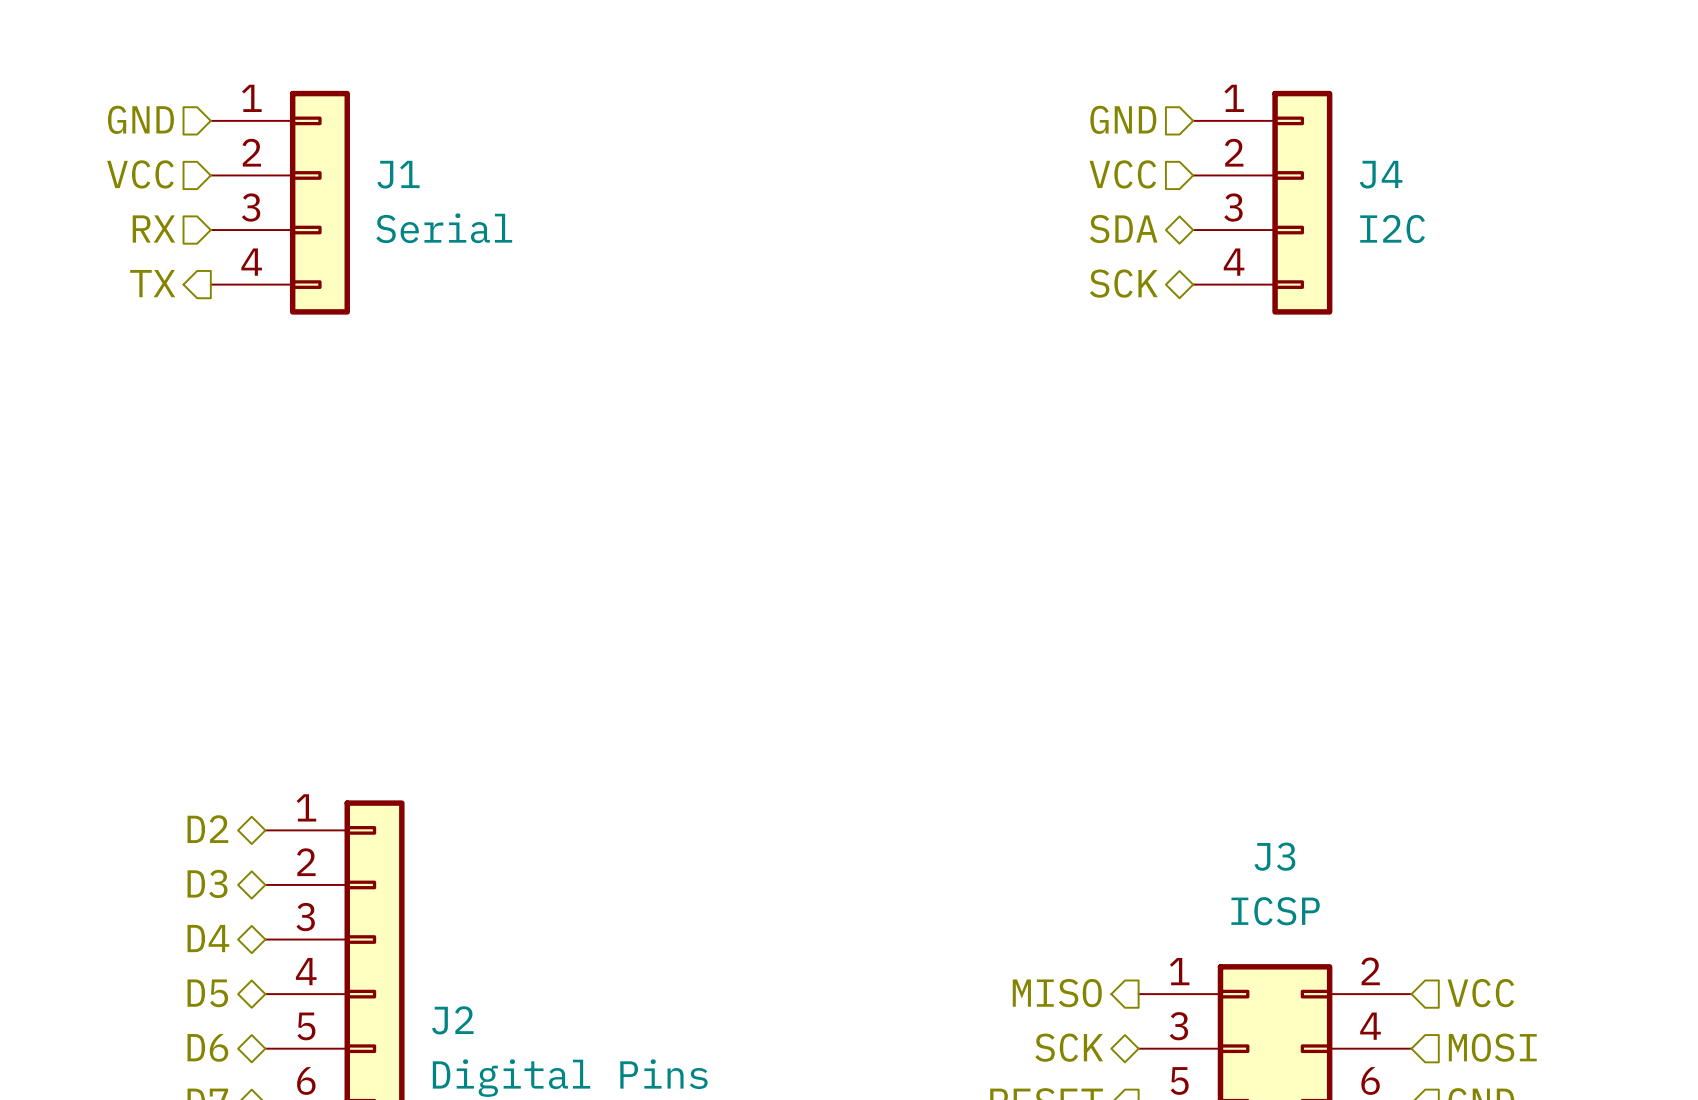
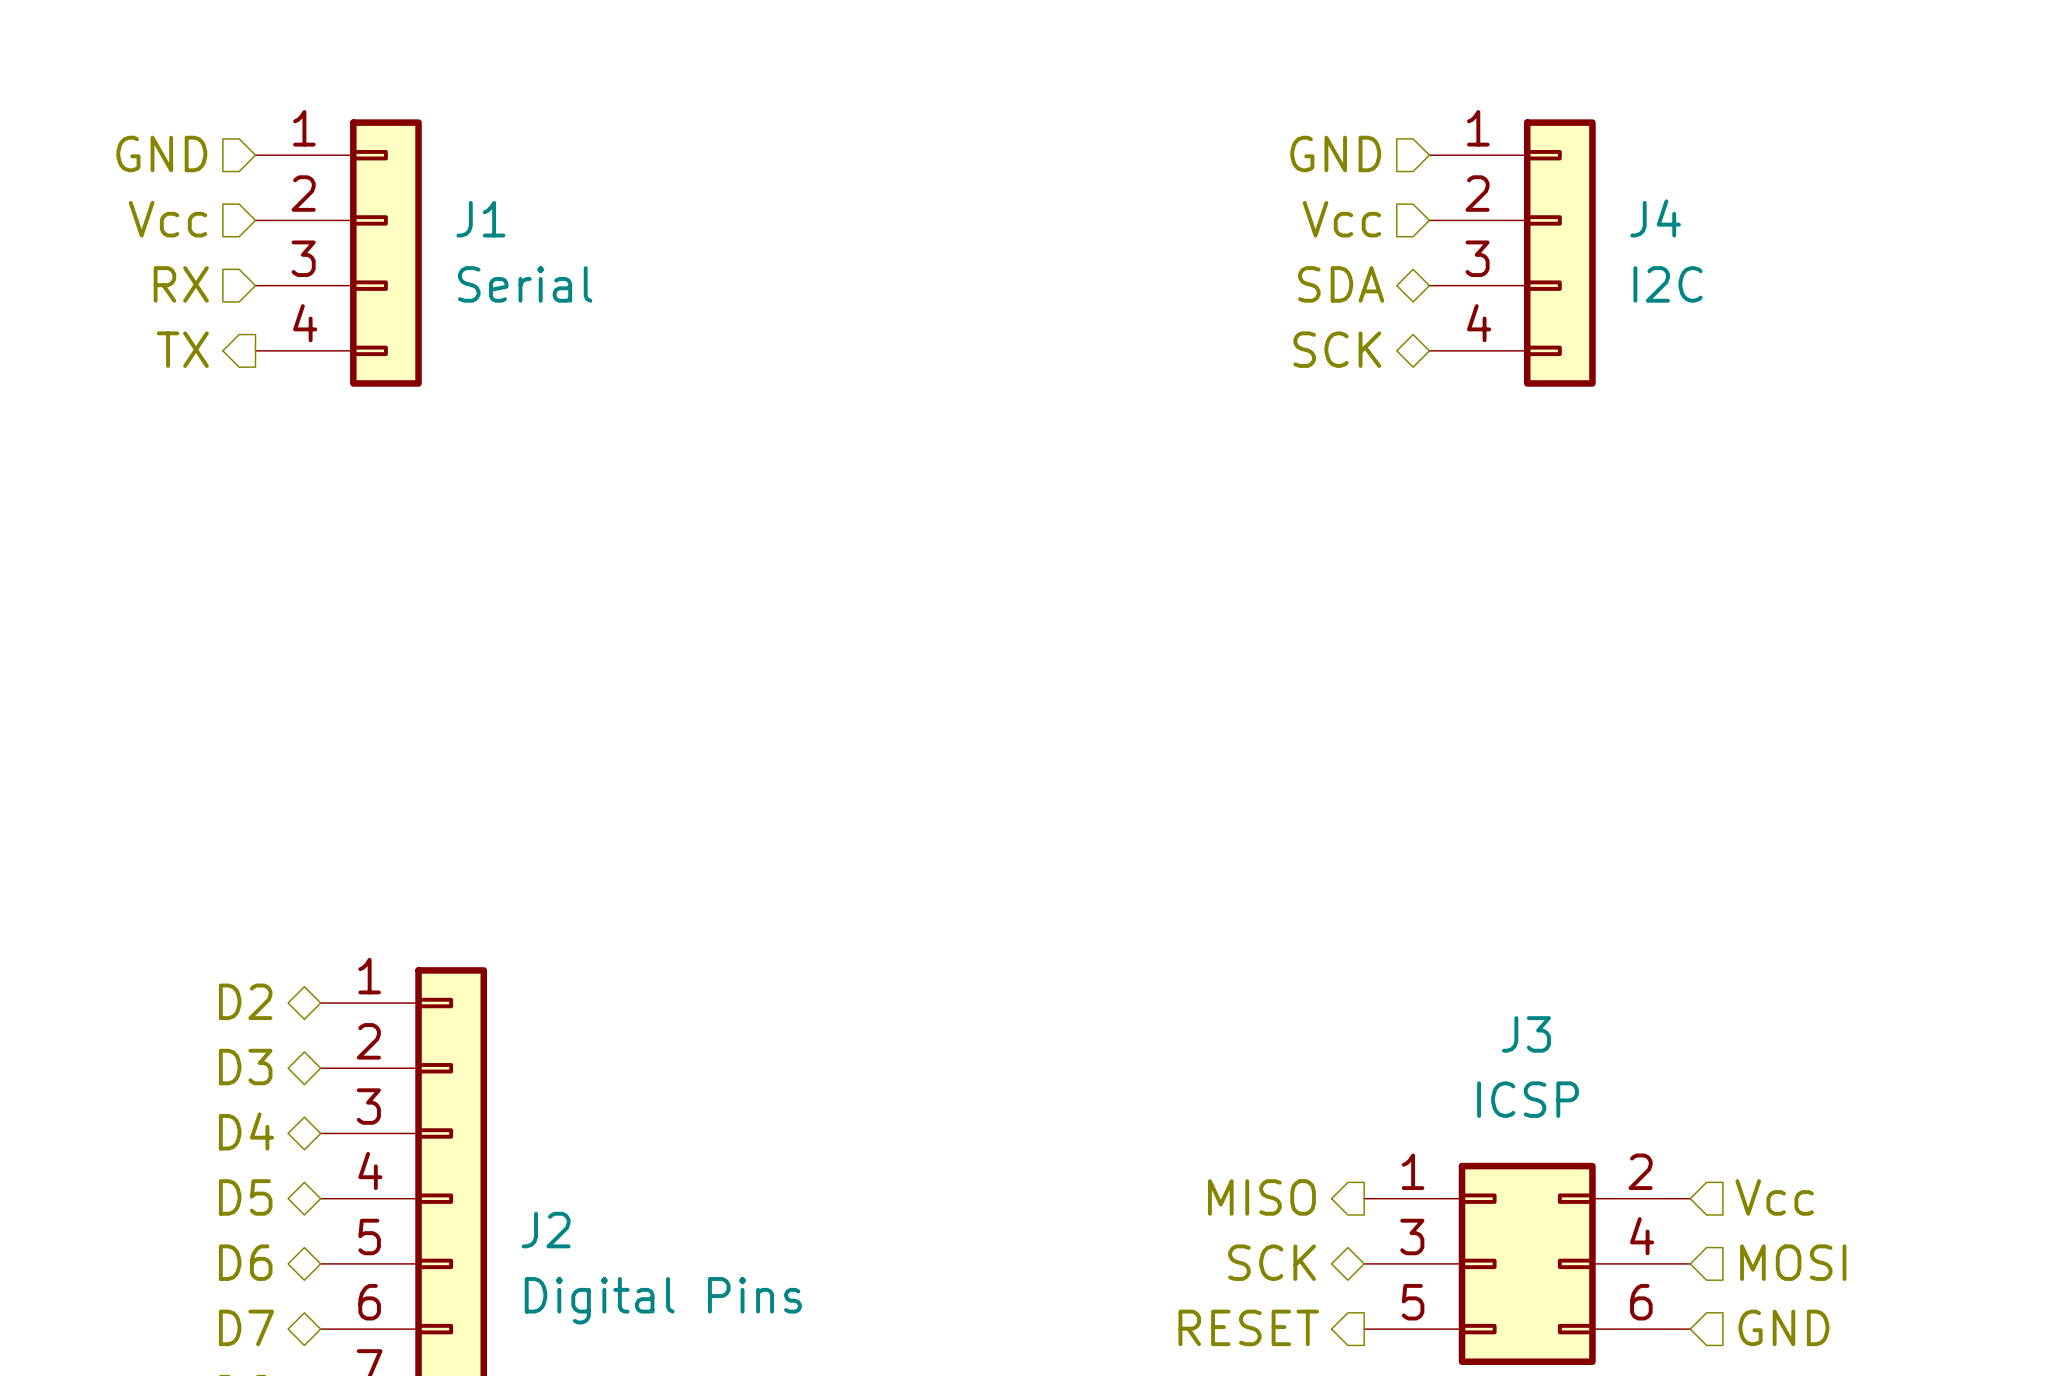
hierarchical label: VCC (140, 174) -> Vcc (168, 219)
hierarchical label: VCC (1122, 174) -> Vcc (1341, 219)
hierarchical label: VCC (1480, 993) -> Vcc (1774, 1197)

